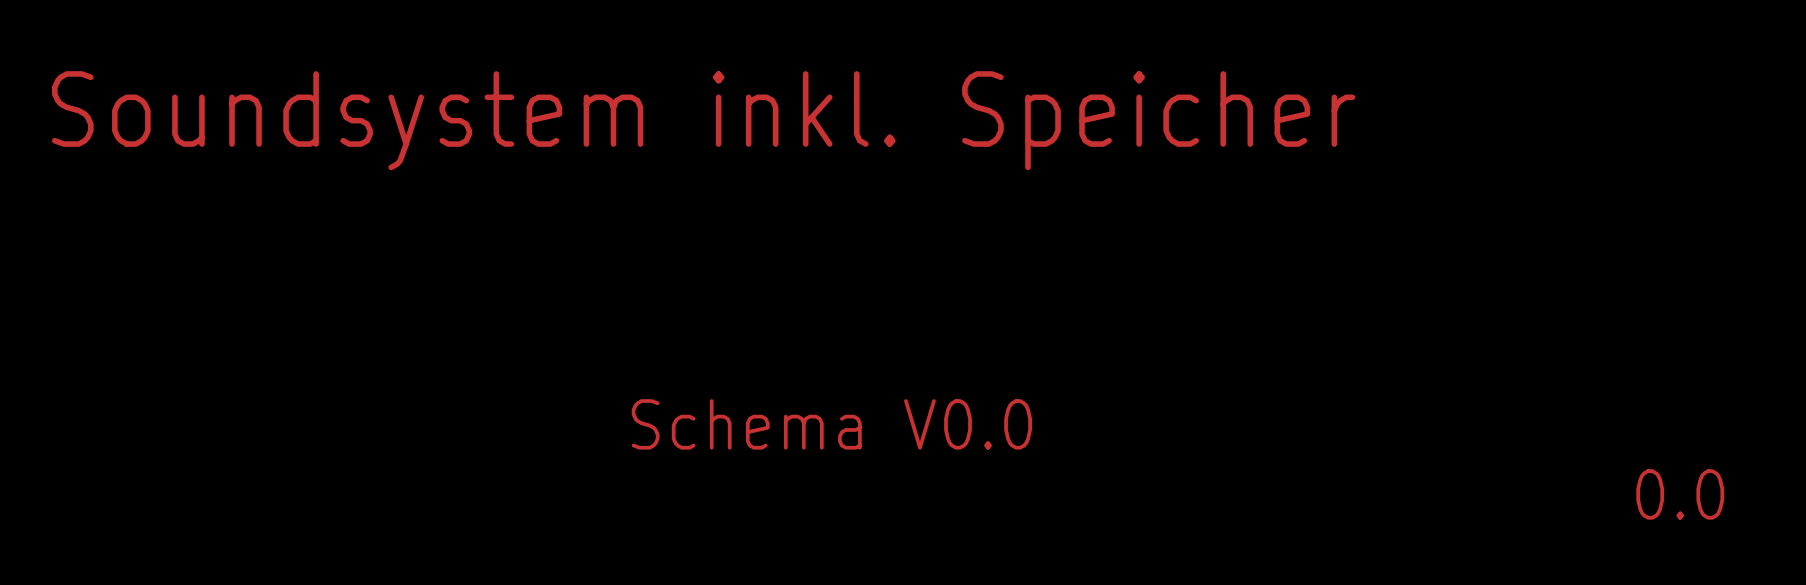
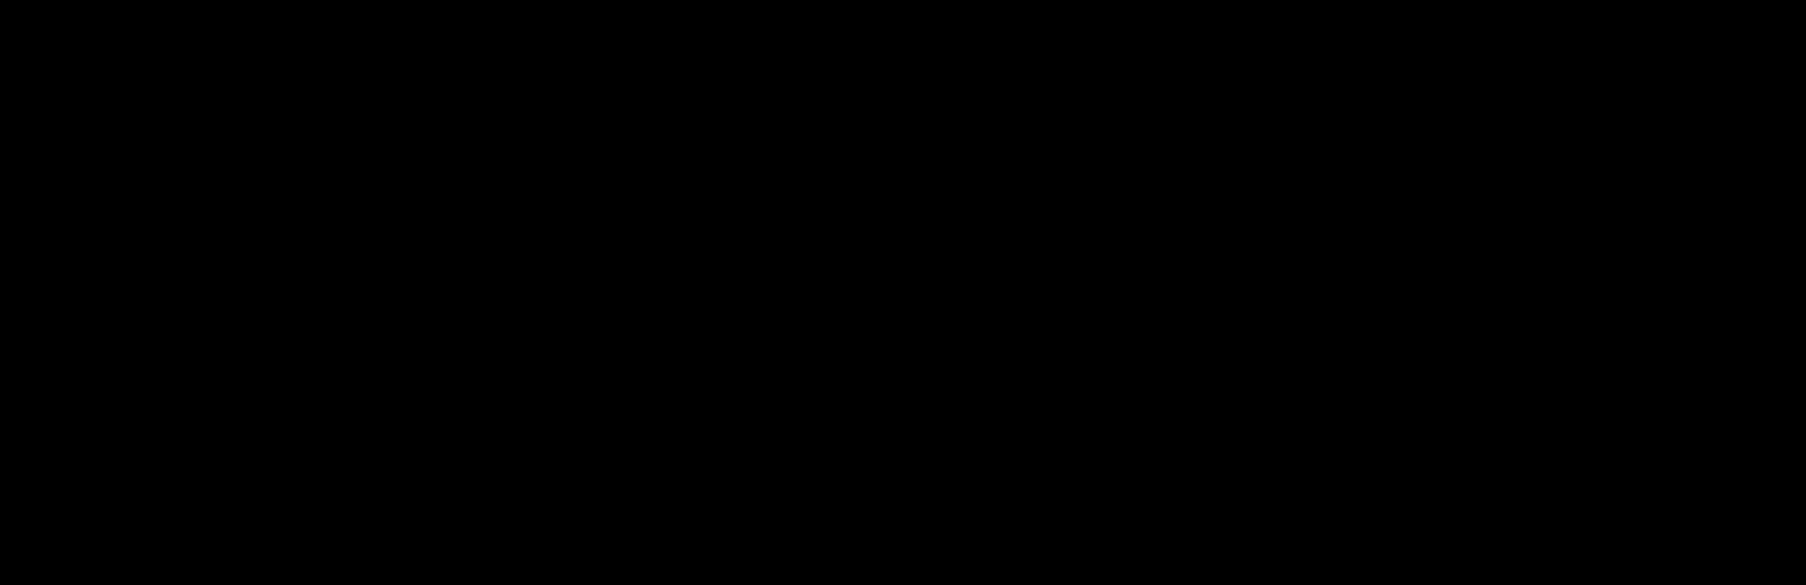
text: Soundsystem inkl. Speicher (703, 120) -> none
text: Schema V0.0 (831, 424) -> none
text: 0.0 (1680, 494) -> none

